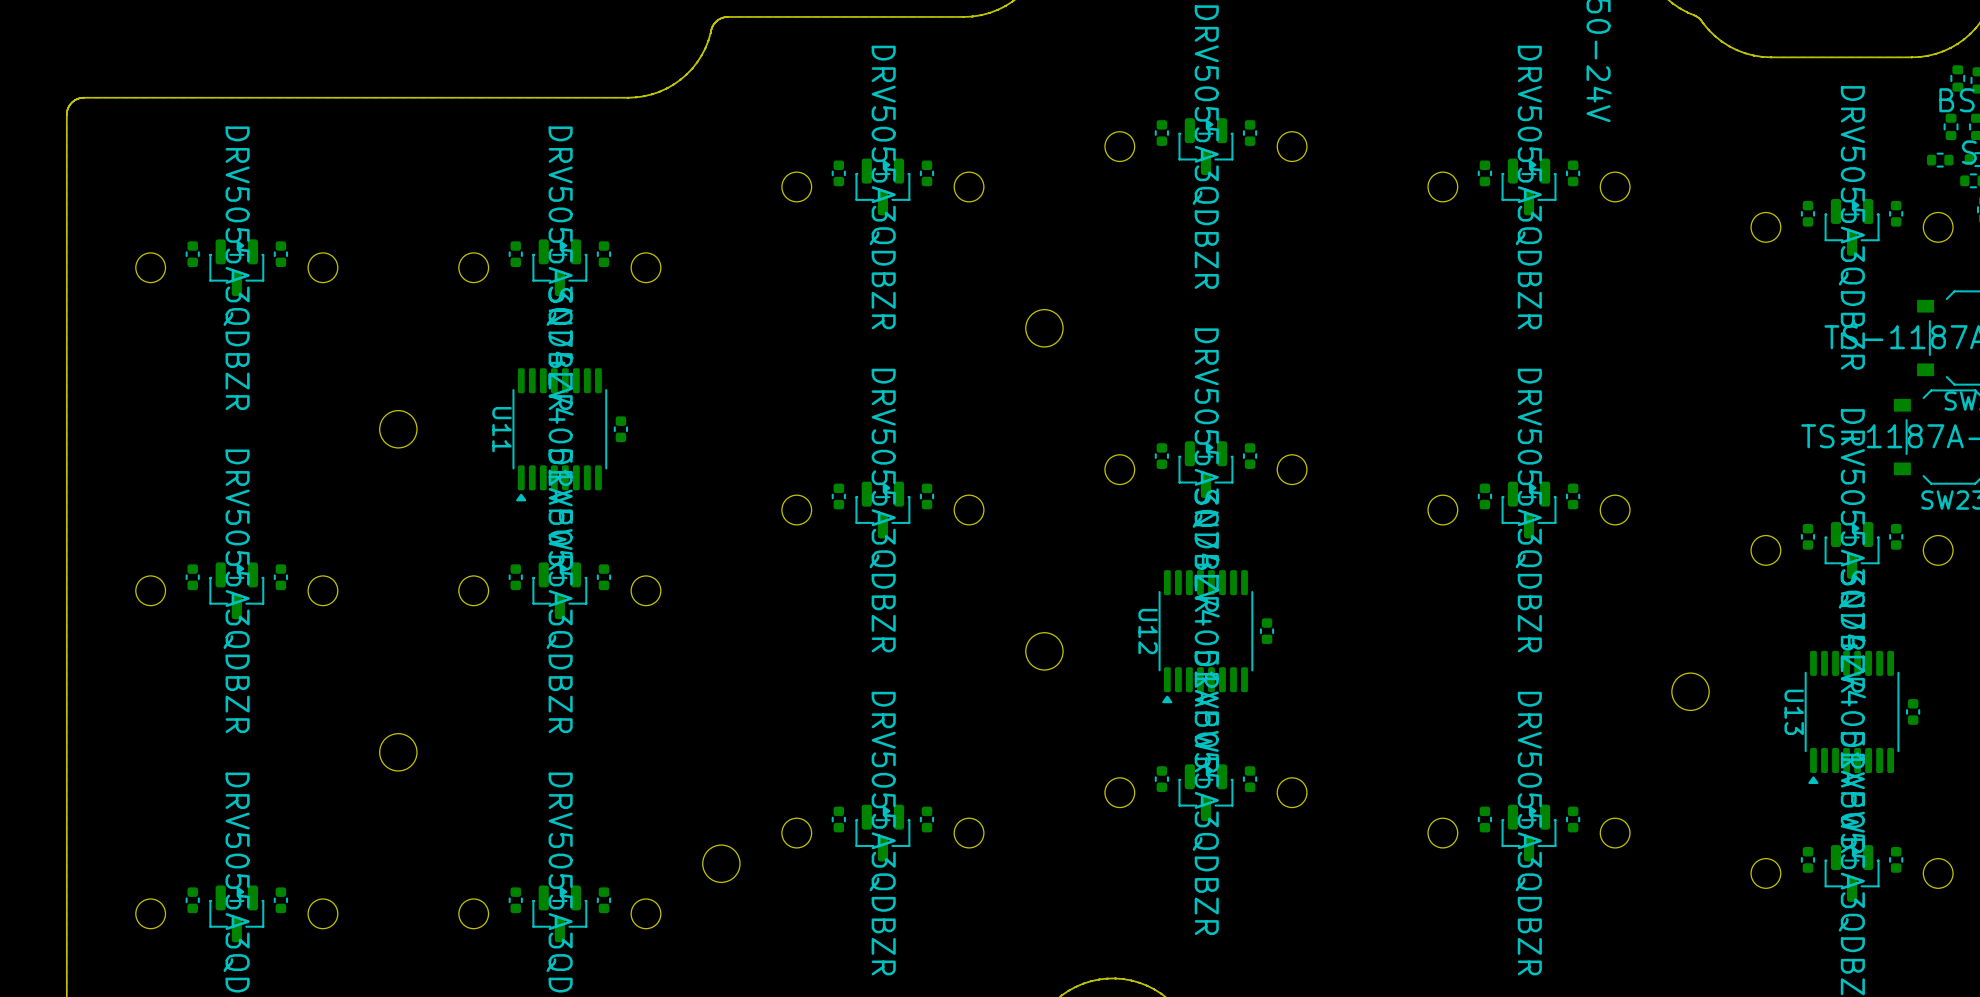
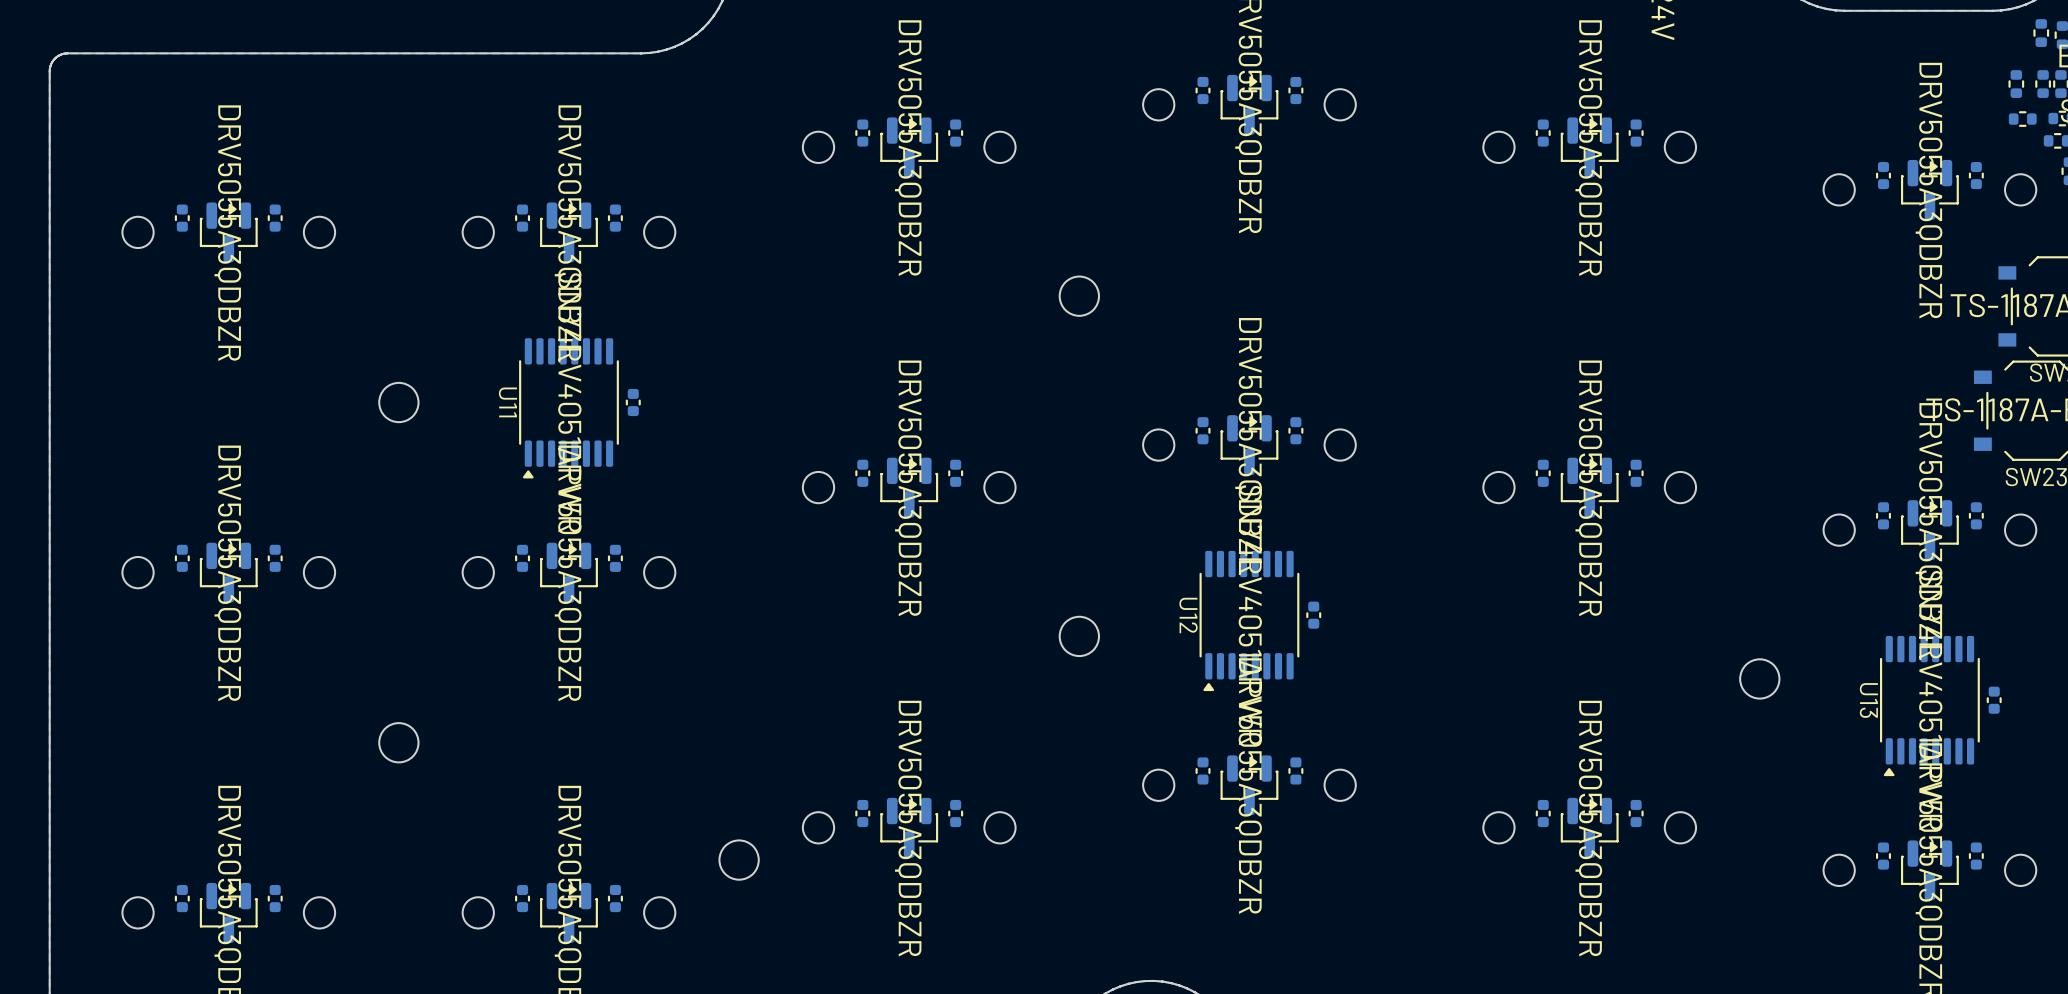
part: none -> (2016, 84)
part: (1951, 126) -> none
part: none -> (2043, 84)

